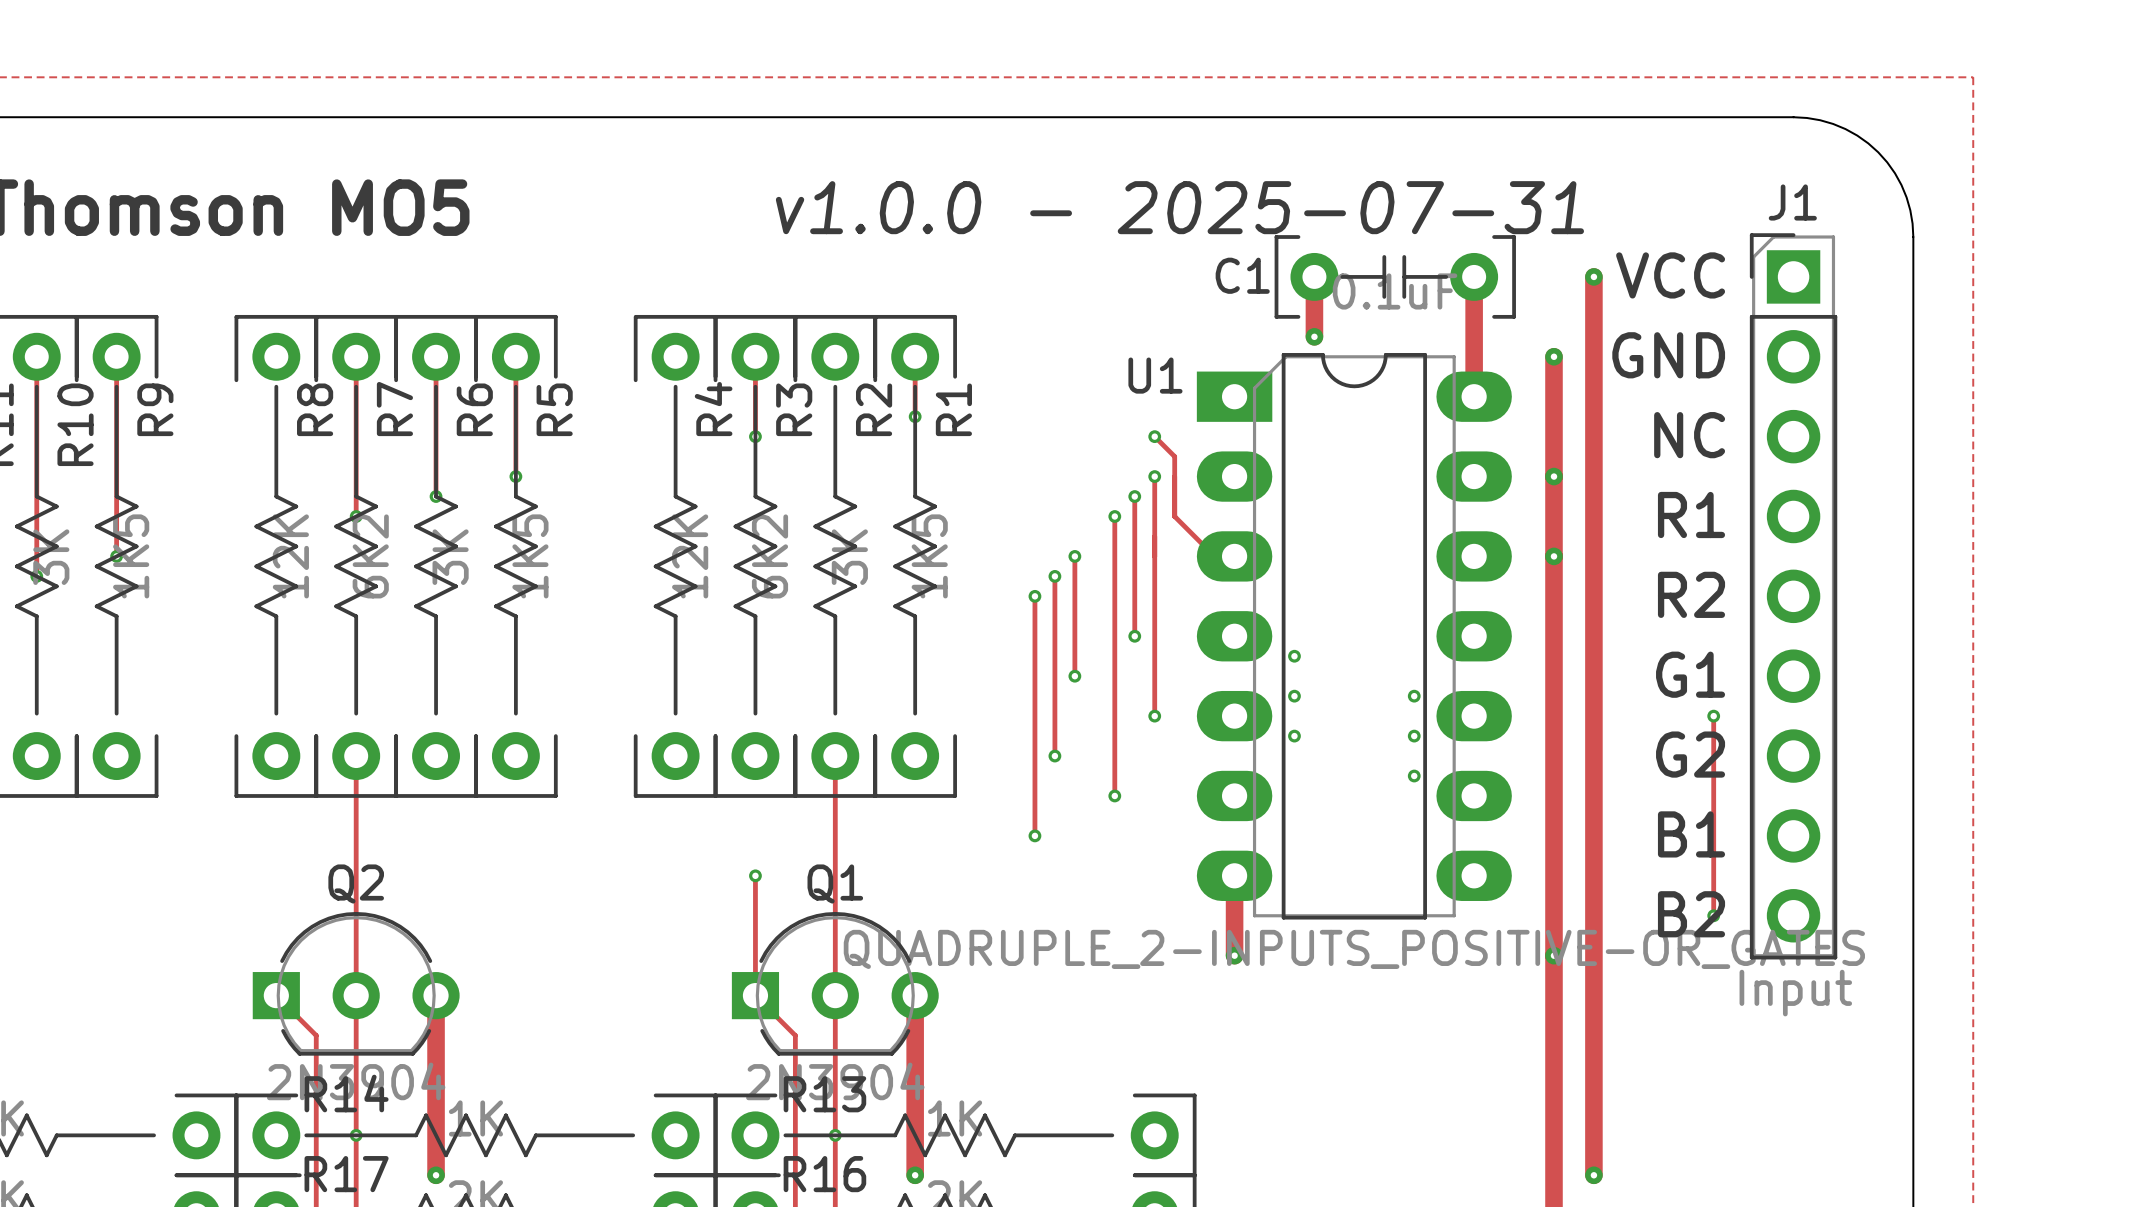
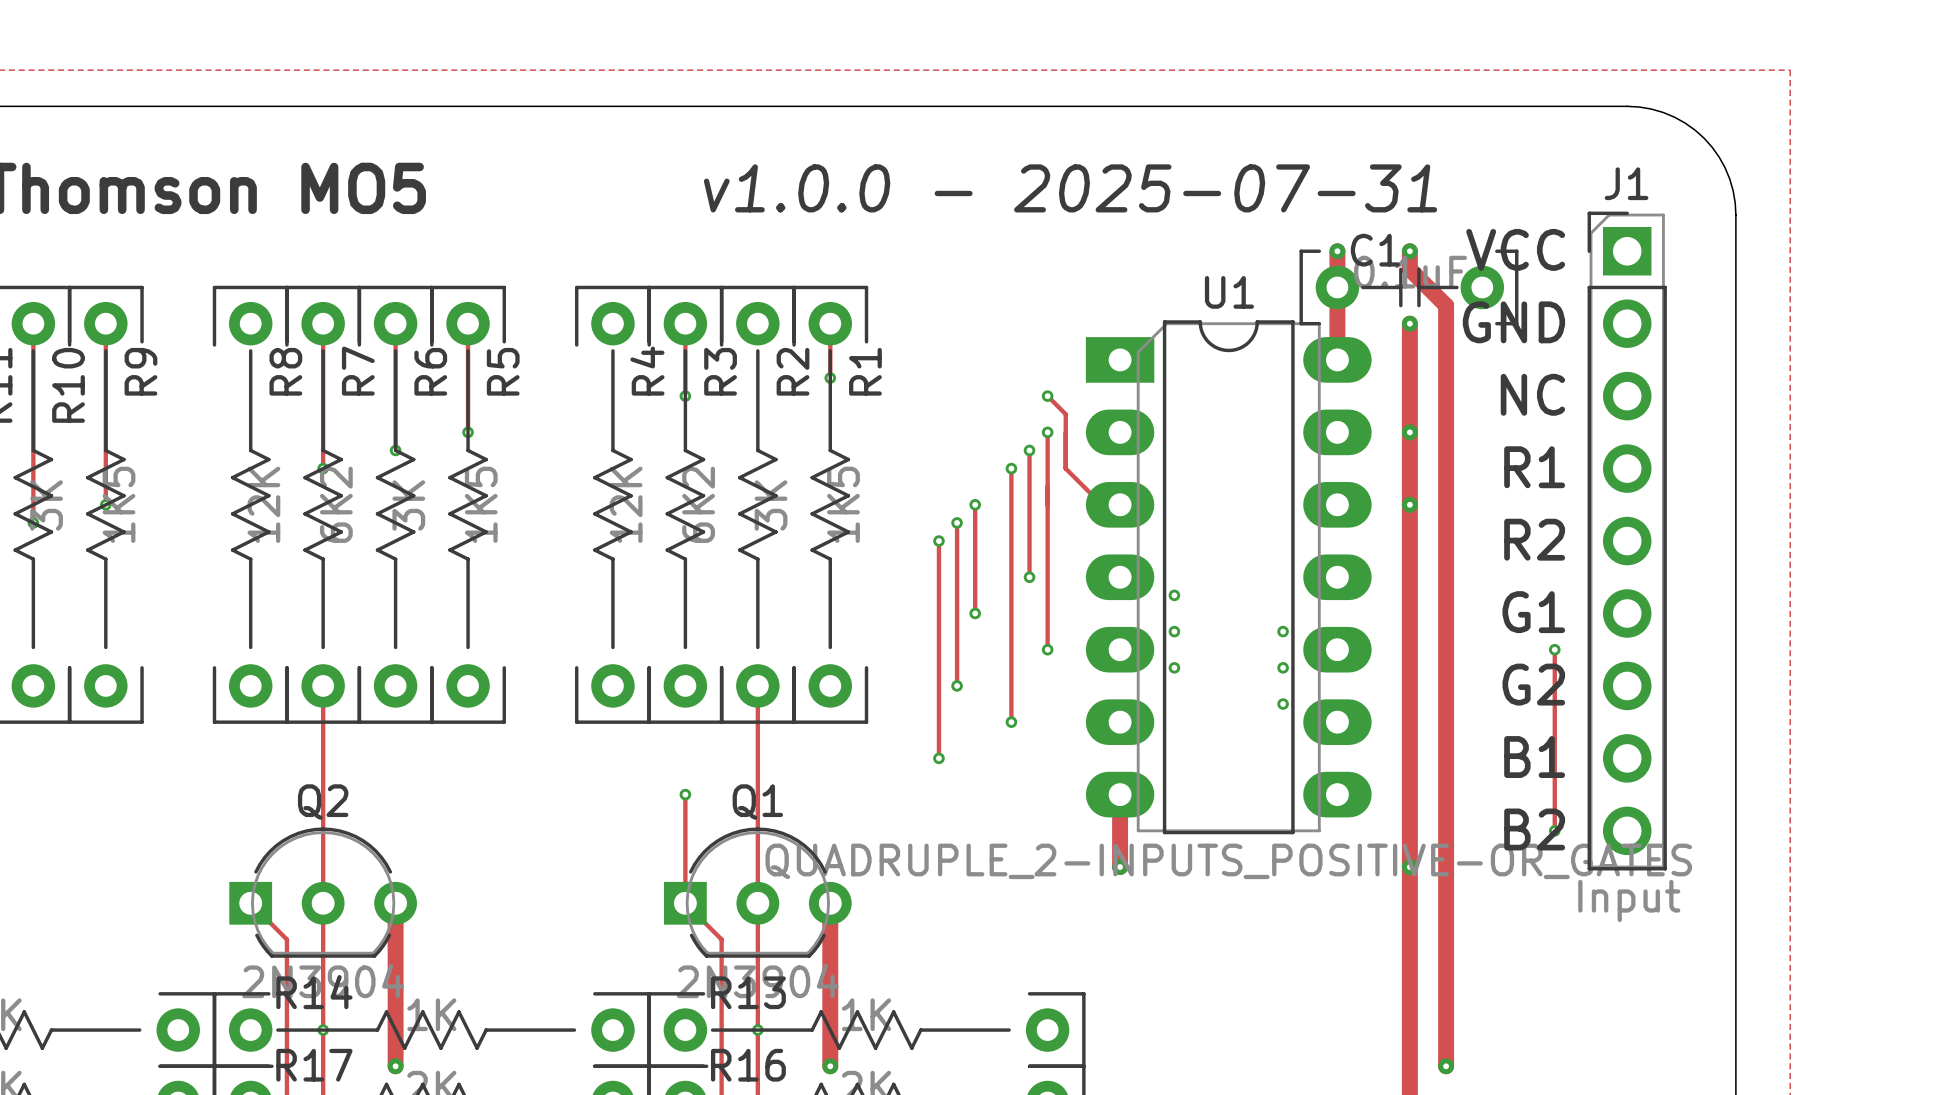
C1 name position: C1 (1242, 275) -> C1 (1375, 250)
track: (1314, 276) (1314, 336) -> none
C1 rotation: 0° (1395, 276) -> 180° (1408, 287)
C1 position: (1395, 276) -> (1408, 287)
via: none -> (1337, 251)
track: (1593, 276) (1593, 336) -> (1409, 251) (1409, 269) (1446, 305)
via position: (1593, 276) -> (1409, 251)
via: (1314, 336) -> none
U1 name position: U1 (1155, 375) -> U1 (1229, 292)

